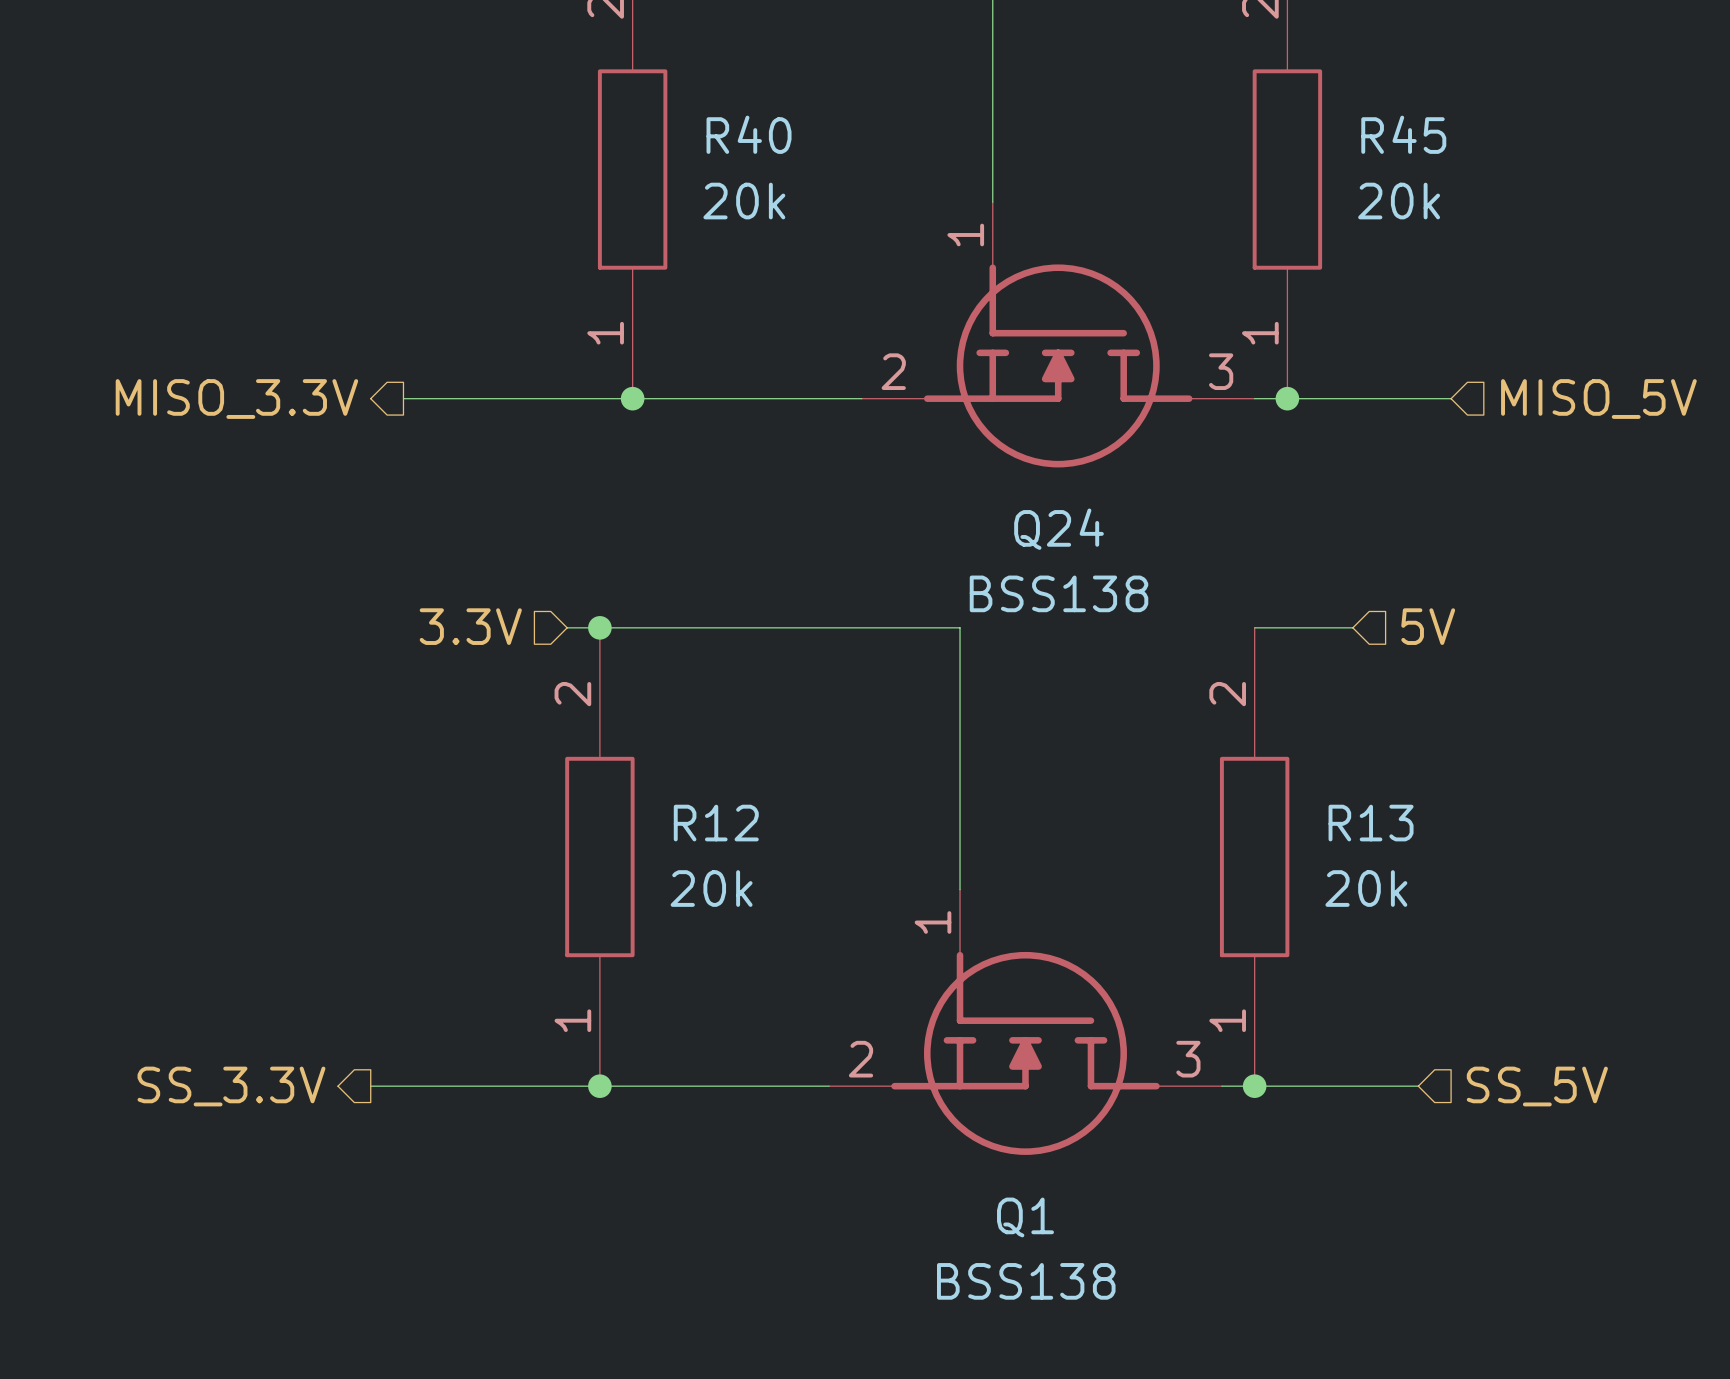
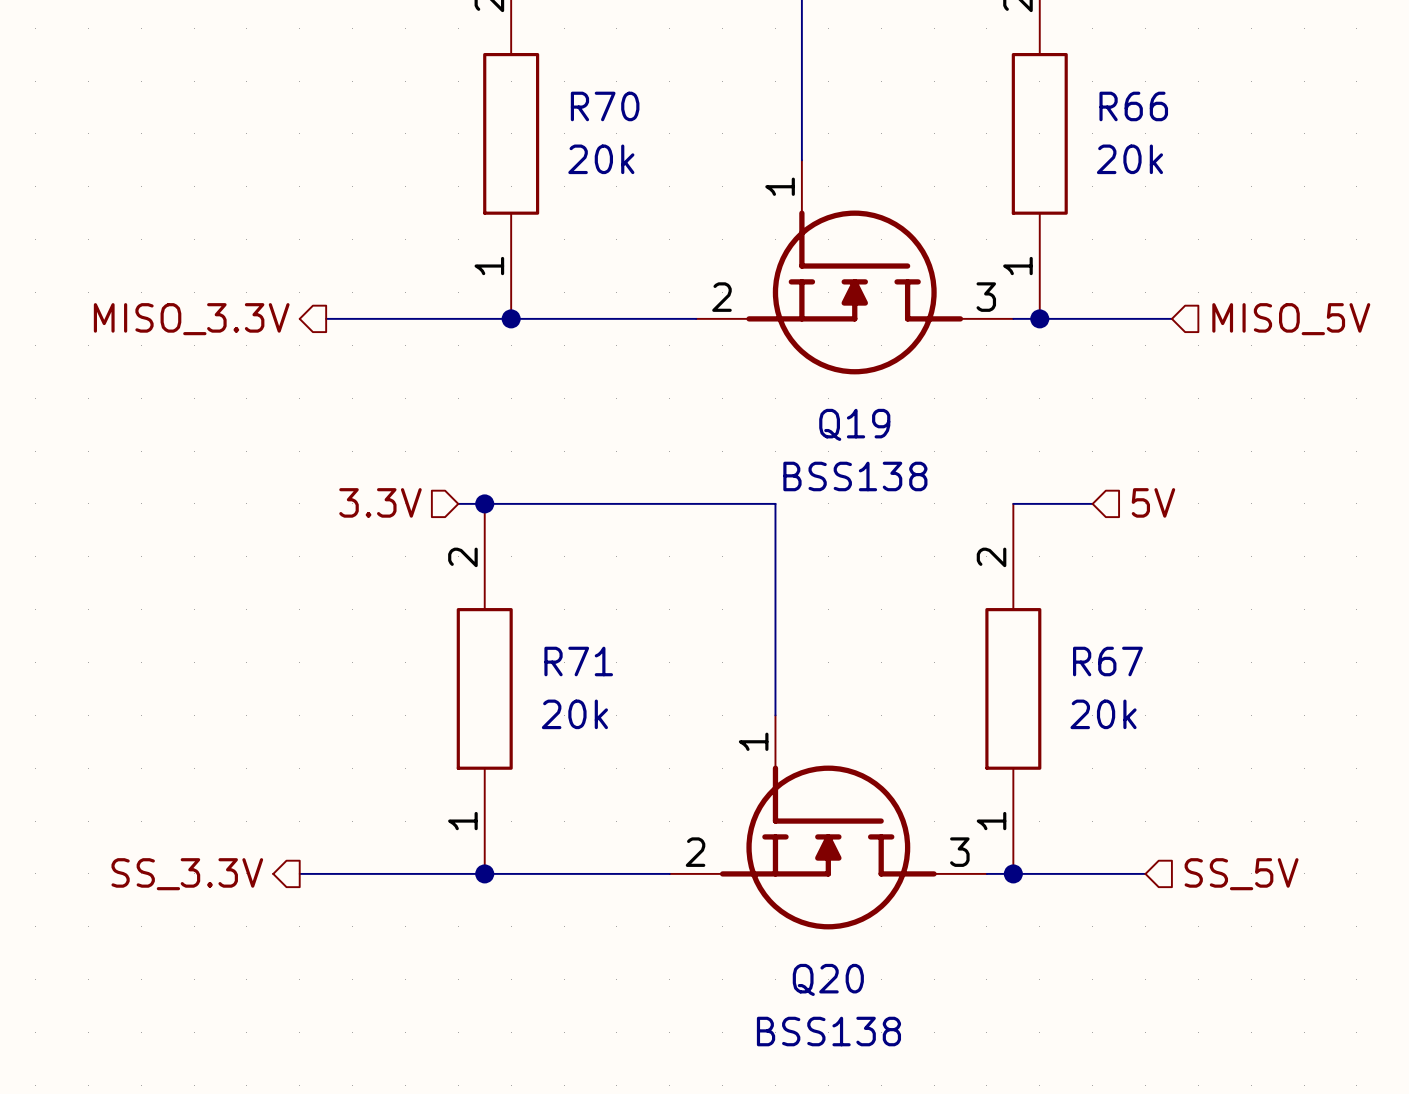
R40 name: R40 (749, 134) -> R70 (605, 106)
R45 name: R45 (1403, 134) -> R66 (1133, 106)
Q24 name: Q24 (1059, 529) -> Q19 (854, 424)
R12 name: R12 (716, 823) -> R71 (578, 661)
R13 name: R13 (1371, 823) -> R67 (1107, 661)
Q1 name: Q1 (1025, 1217) -> Q20 (828, 979)

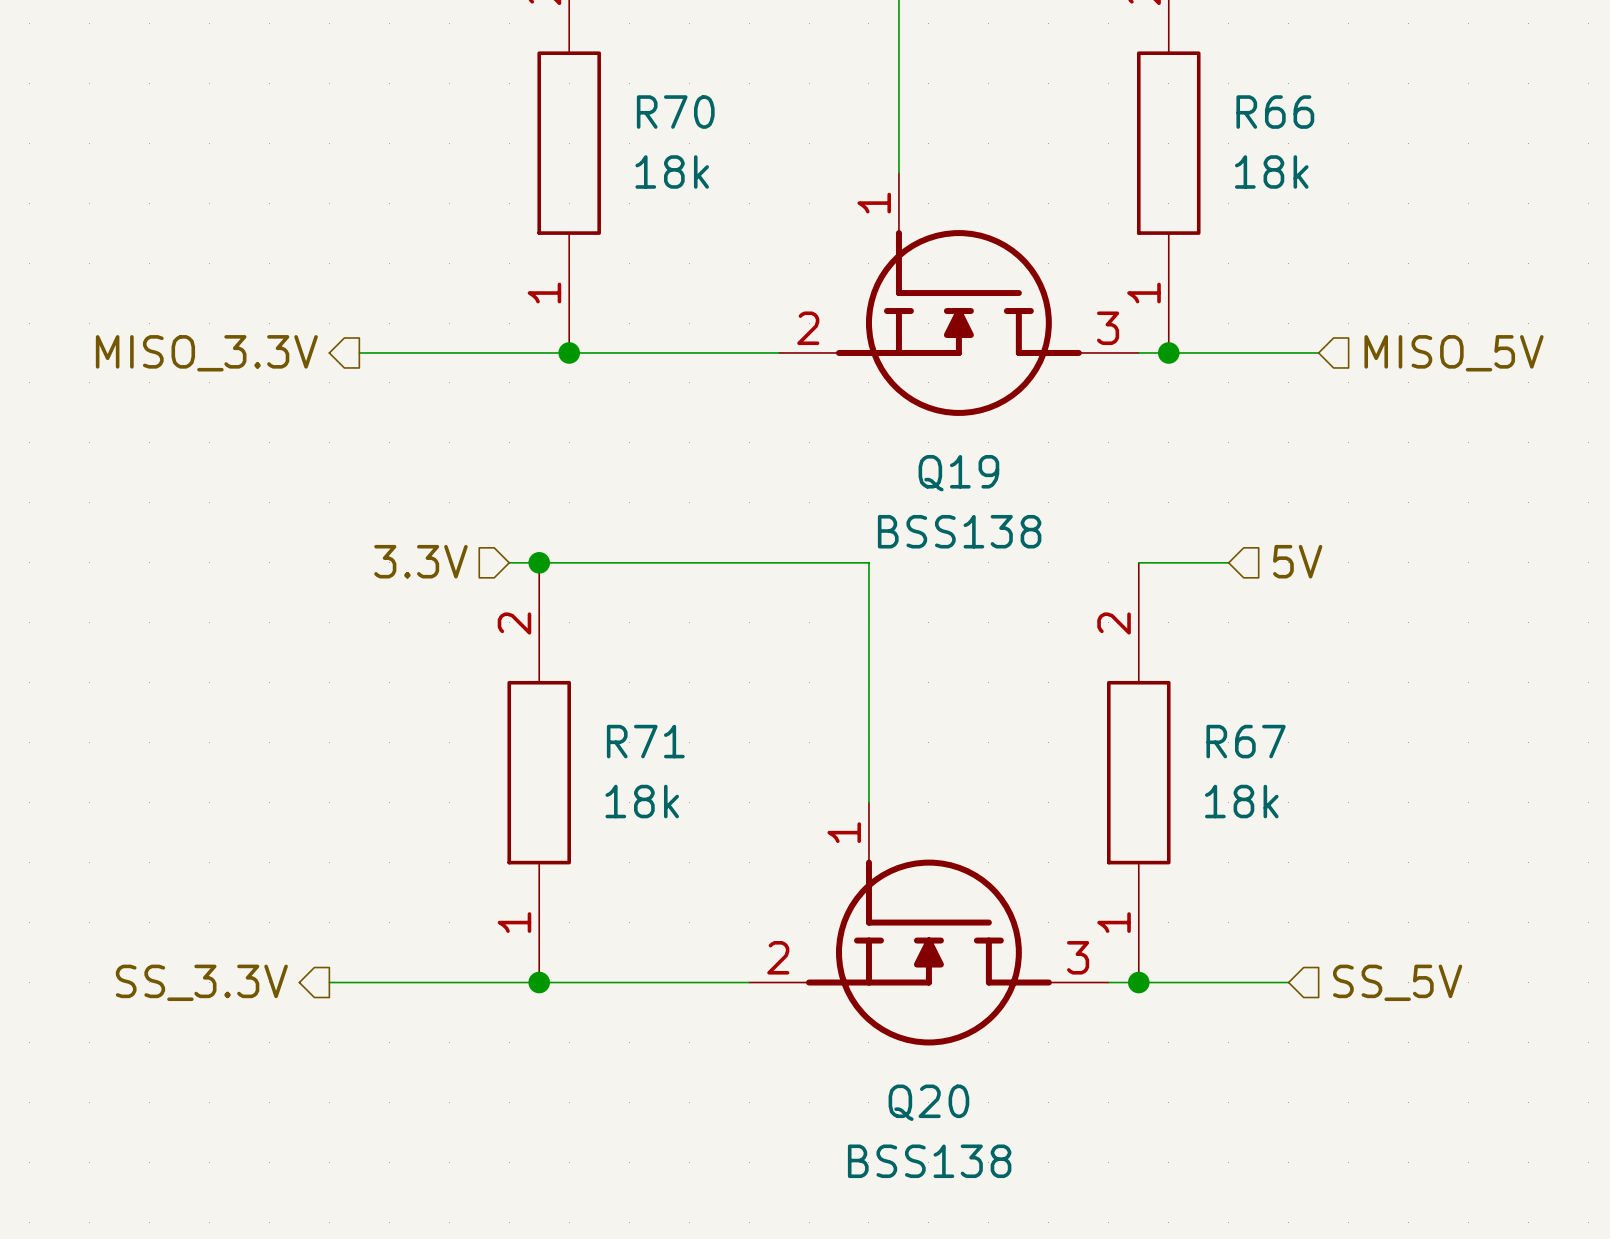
R70 value: 20k (601, 159) -> 18k (672, 171)
R66 value: 20k (1129, 159) -> 18k (1271, 171)
R71 value: 20k (574, 714) -> 18k (642, 801)
R67 value: 20k (1103, 714) -> 18k (1241, 801)

